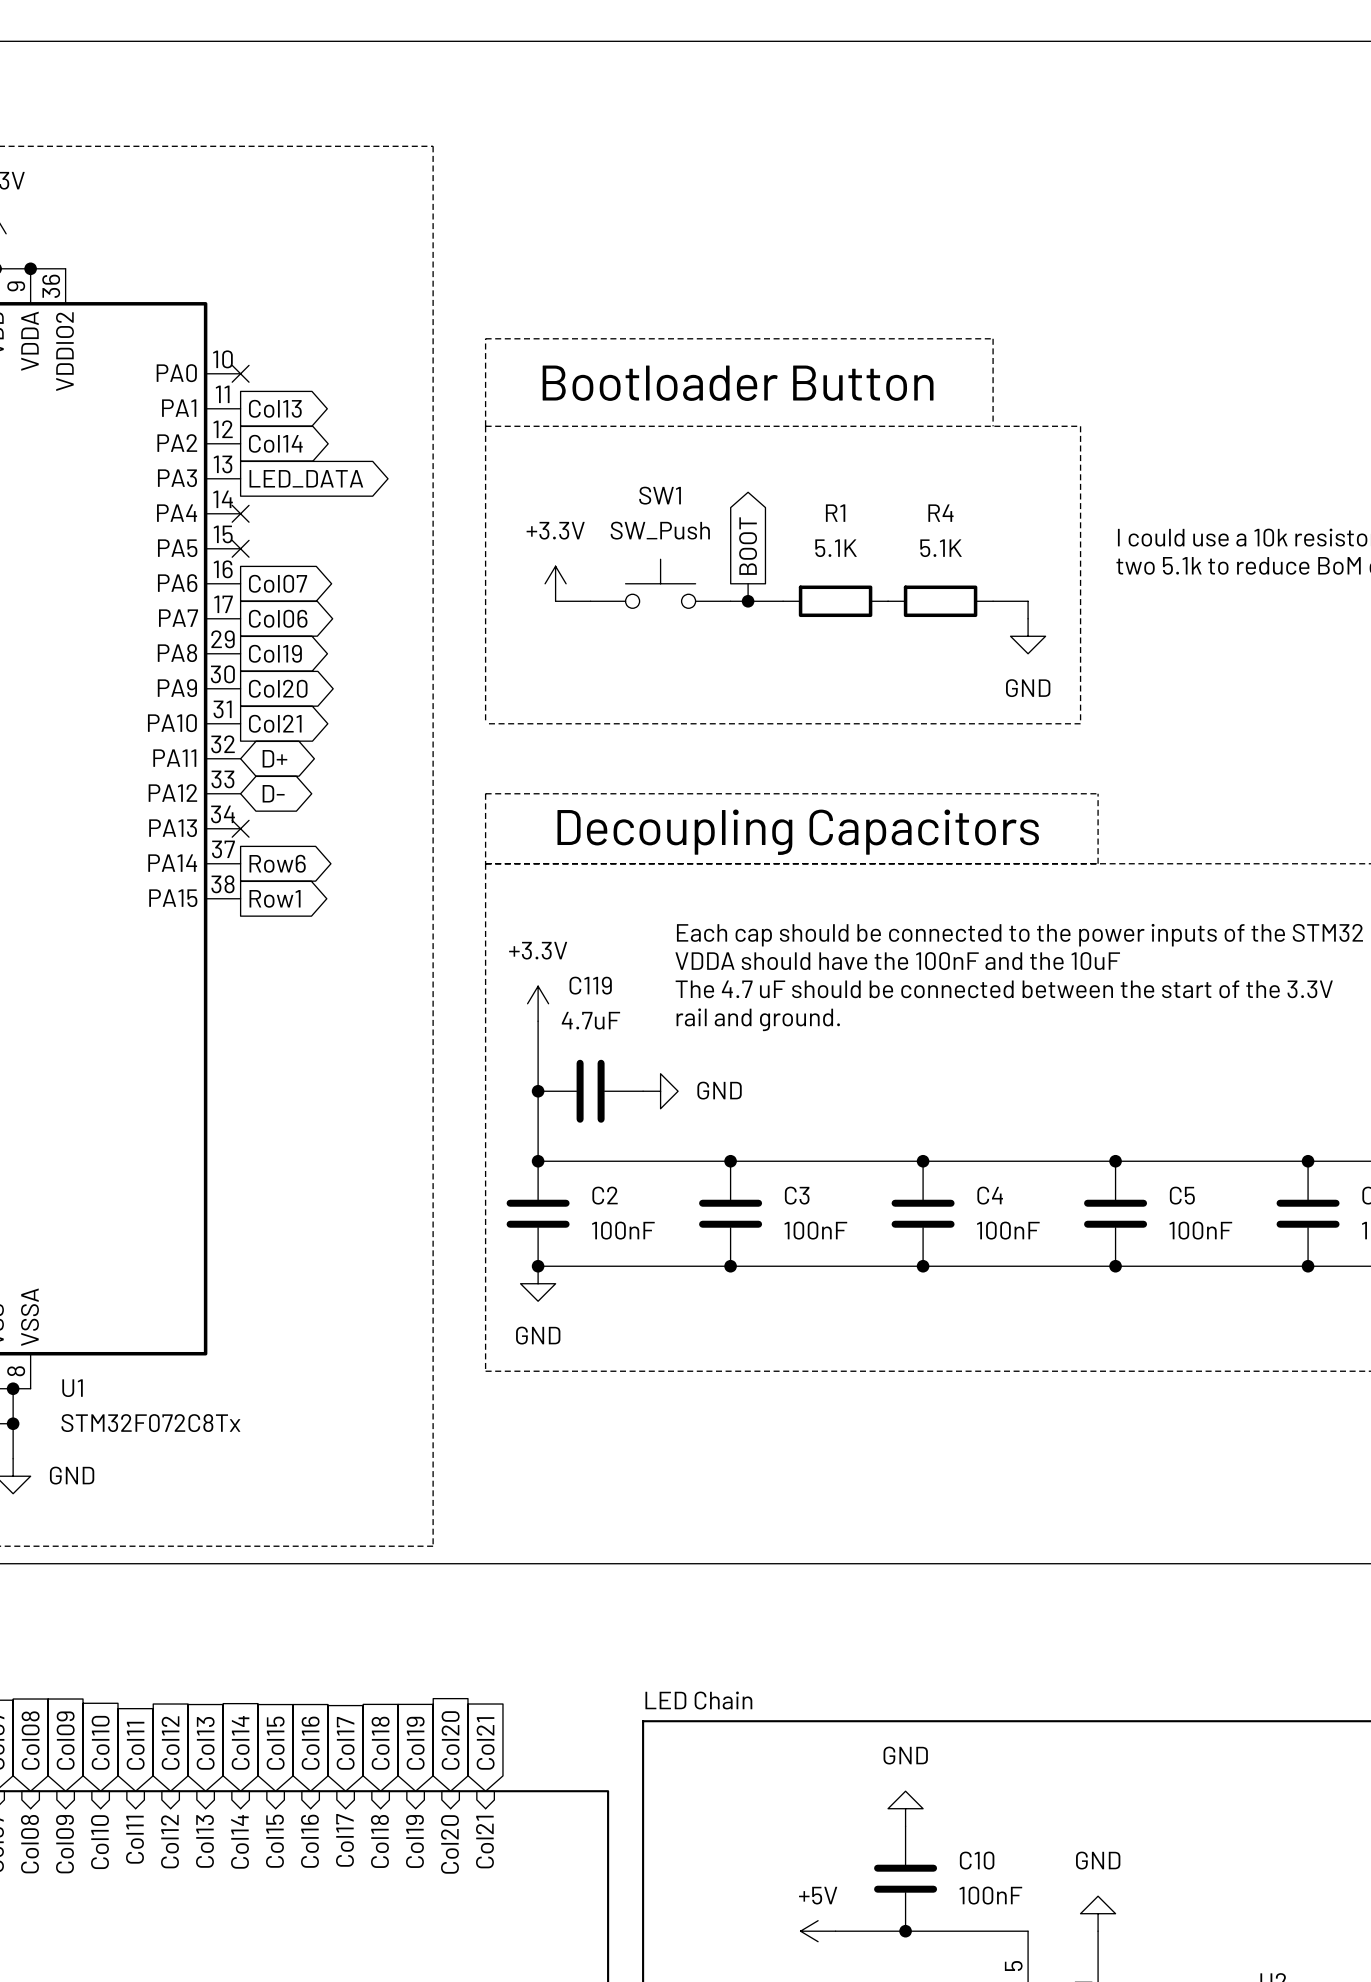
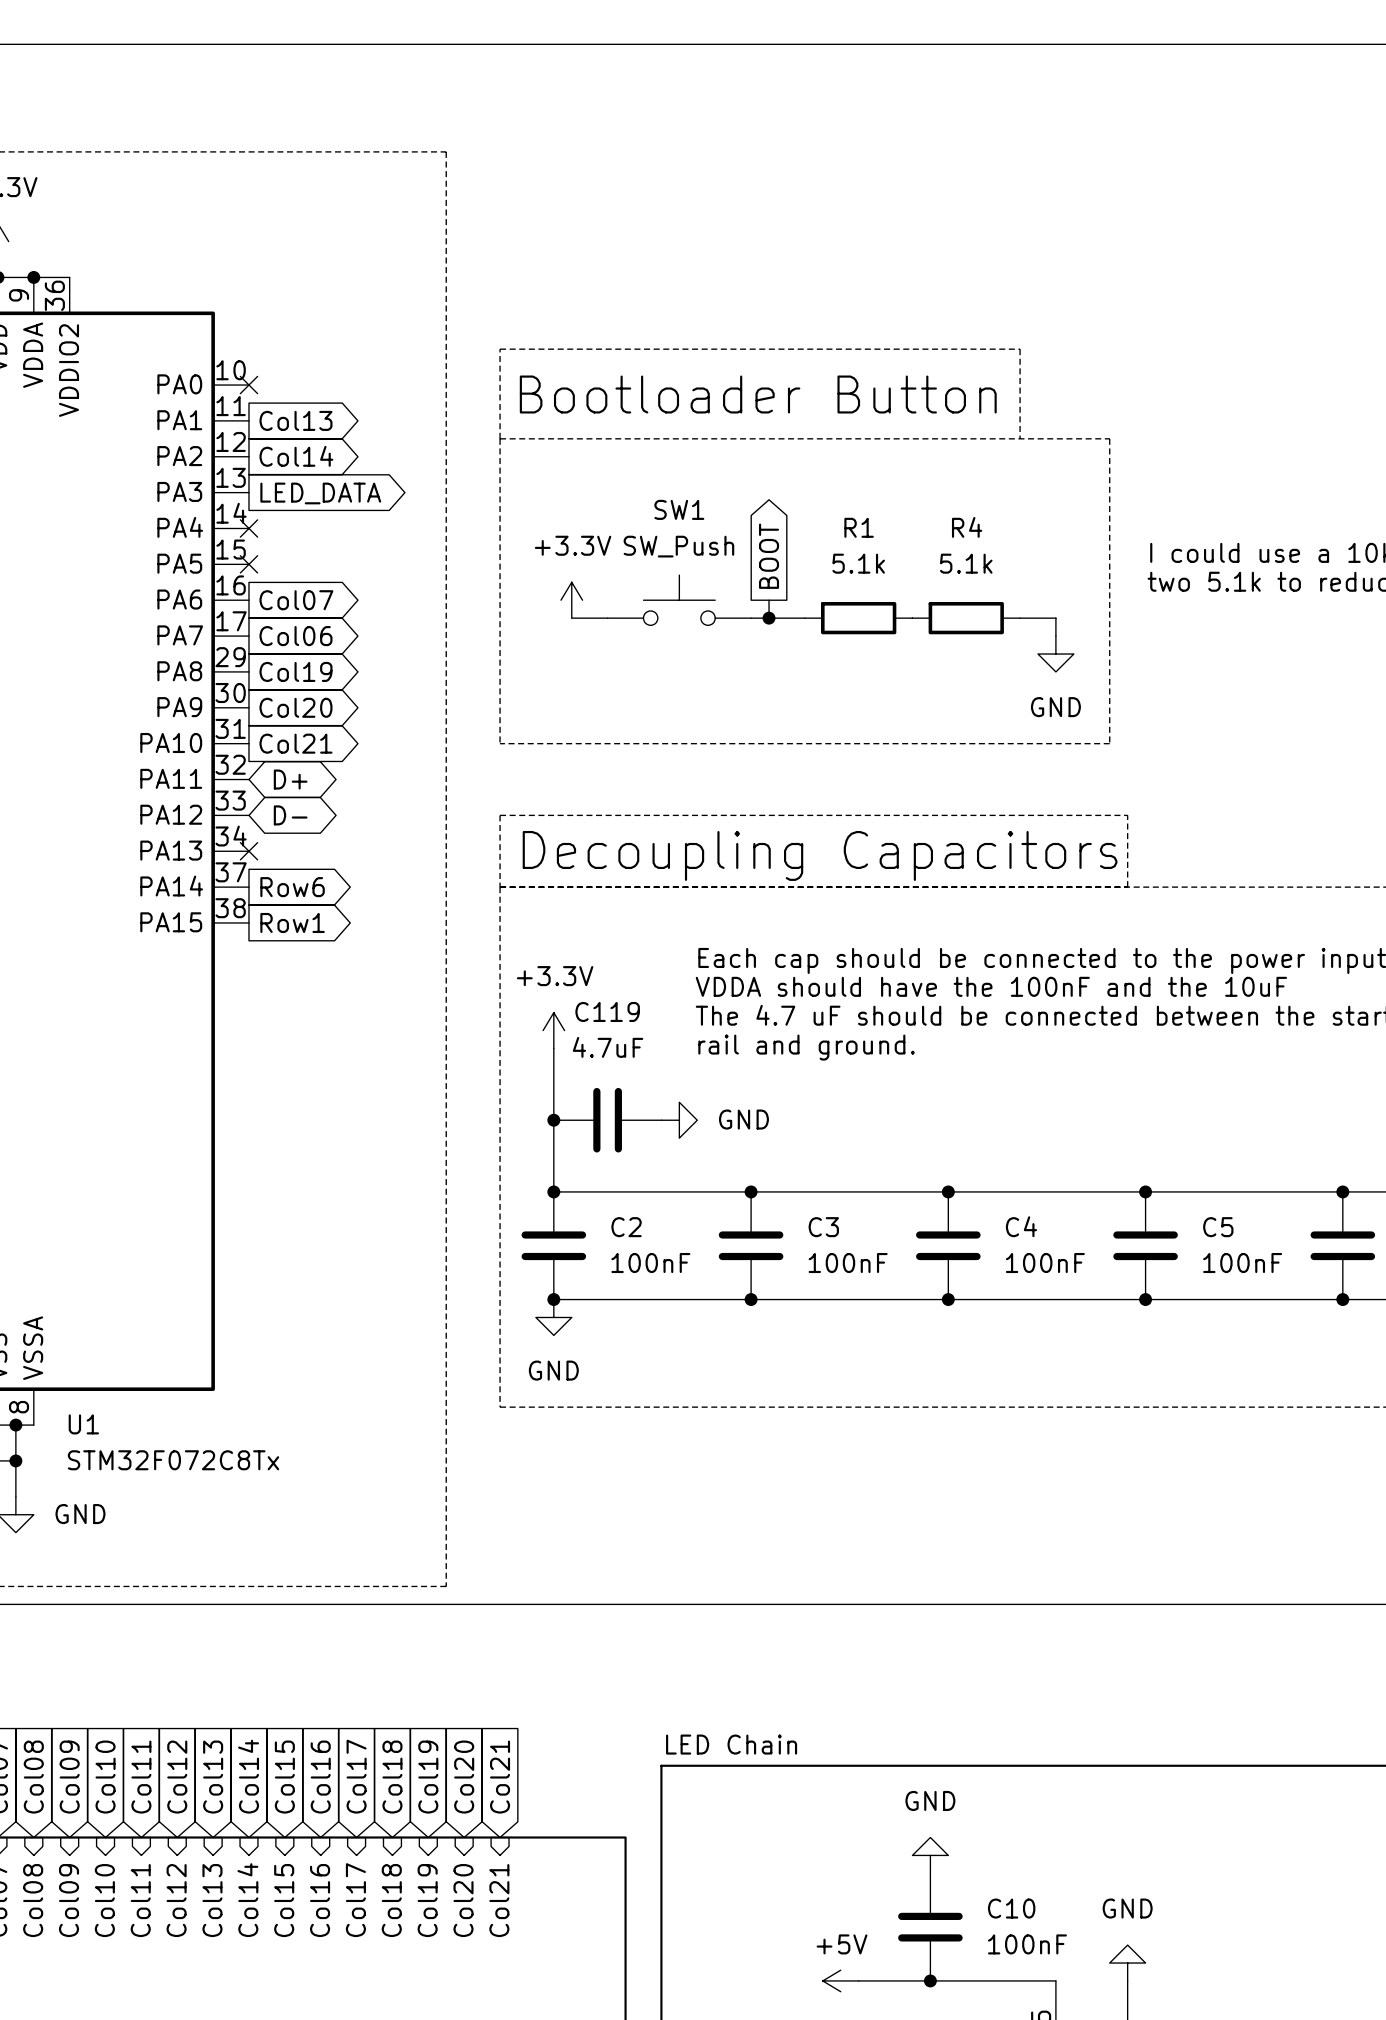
R1 value: 5.1K (836, 548) -> 5.1k (858, 563)
R4 value: 5.1K (941, 548) -> 5.1k (966, 563)

